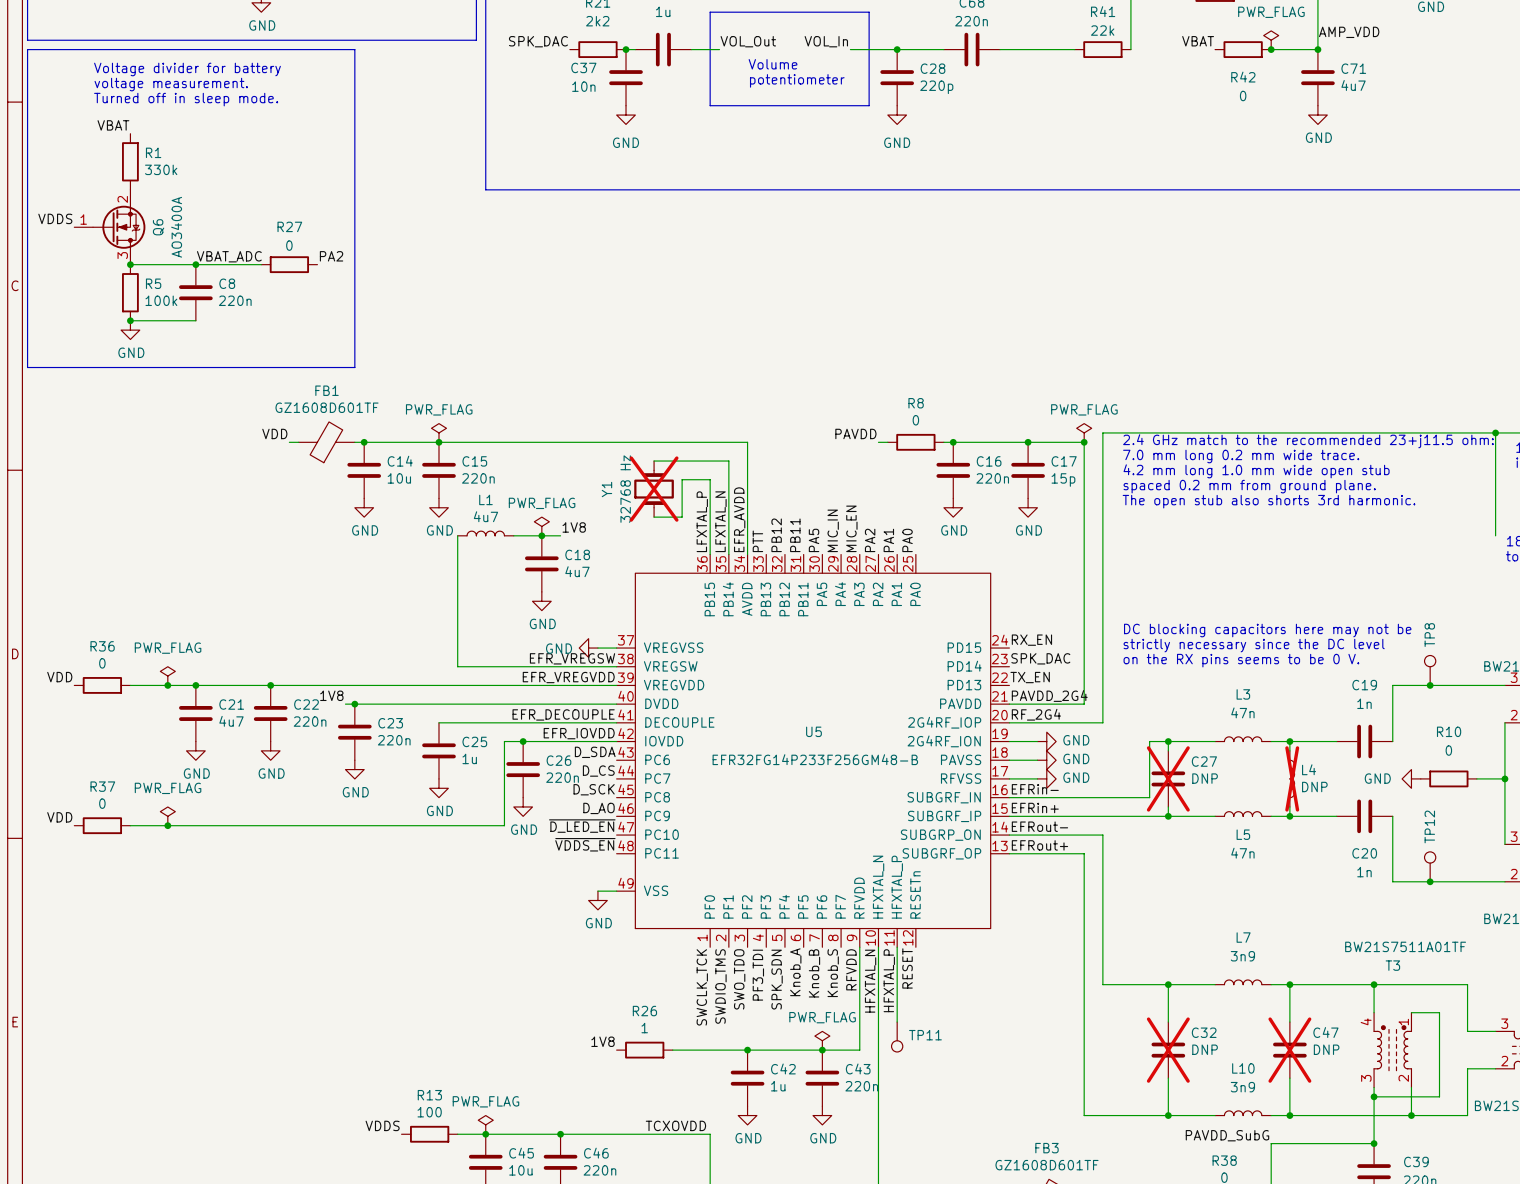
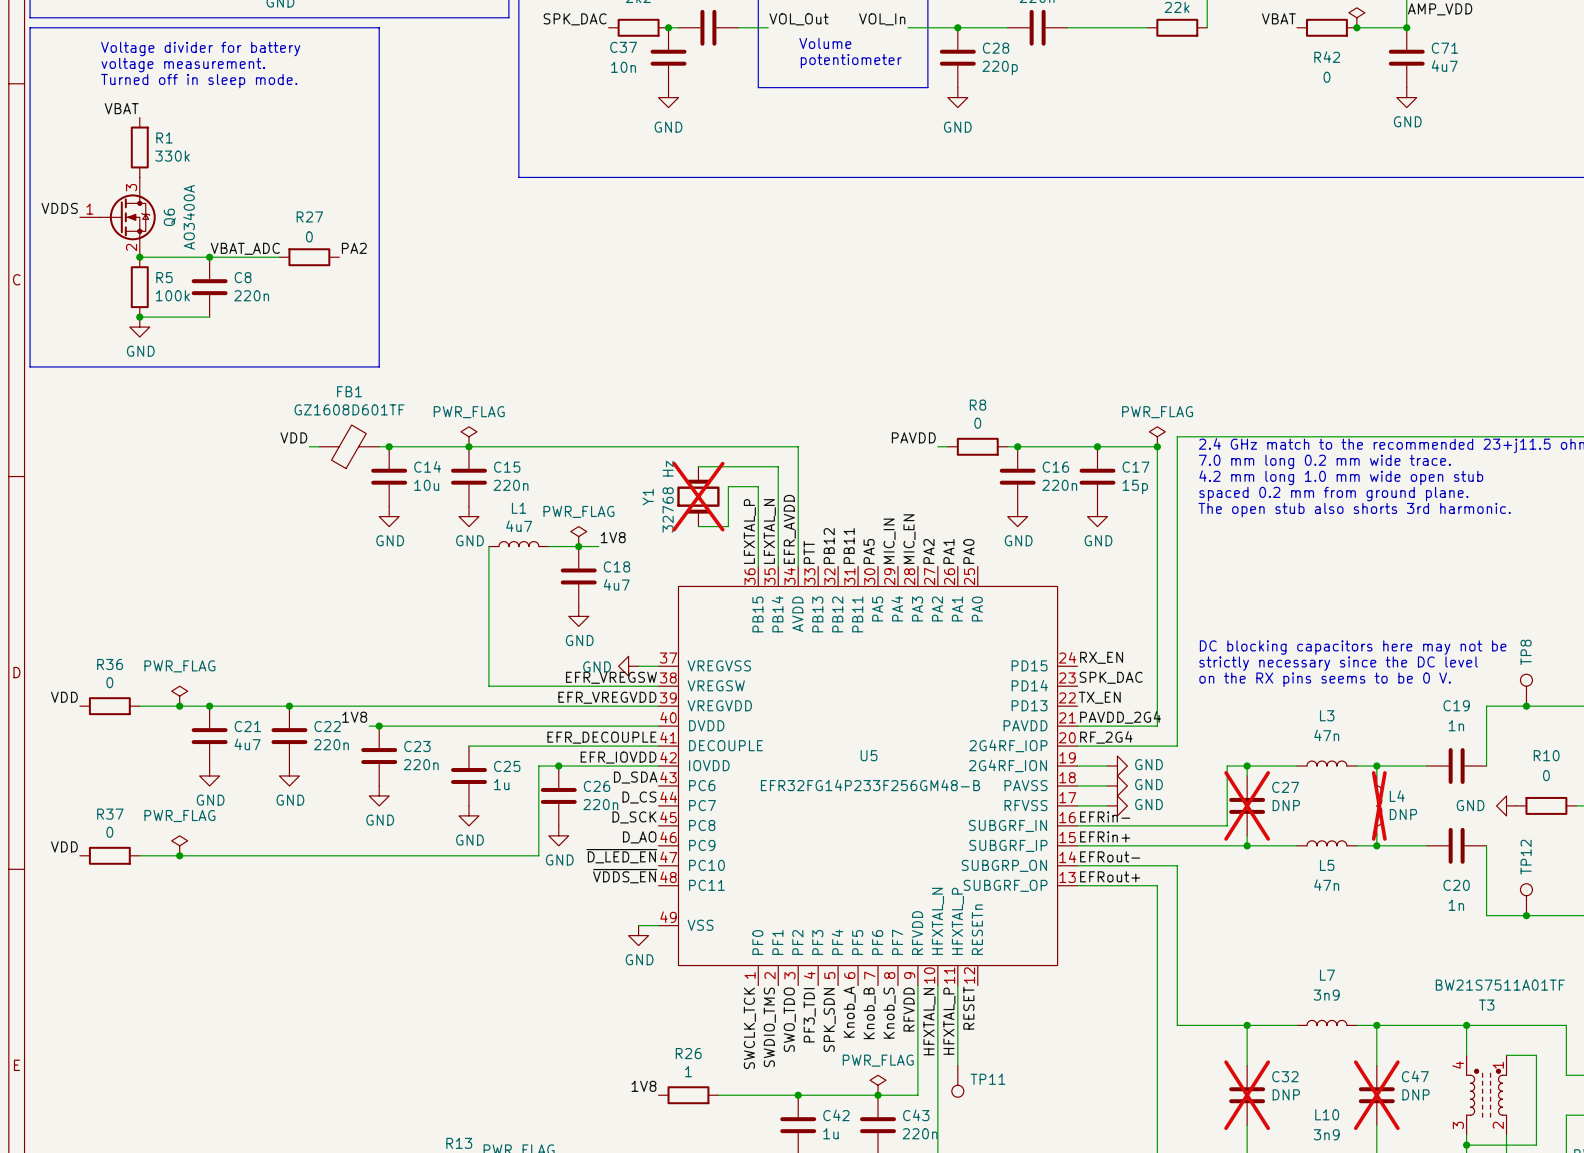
Q6 flip: as is (119, 227) -> up-down (127, 217)

